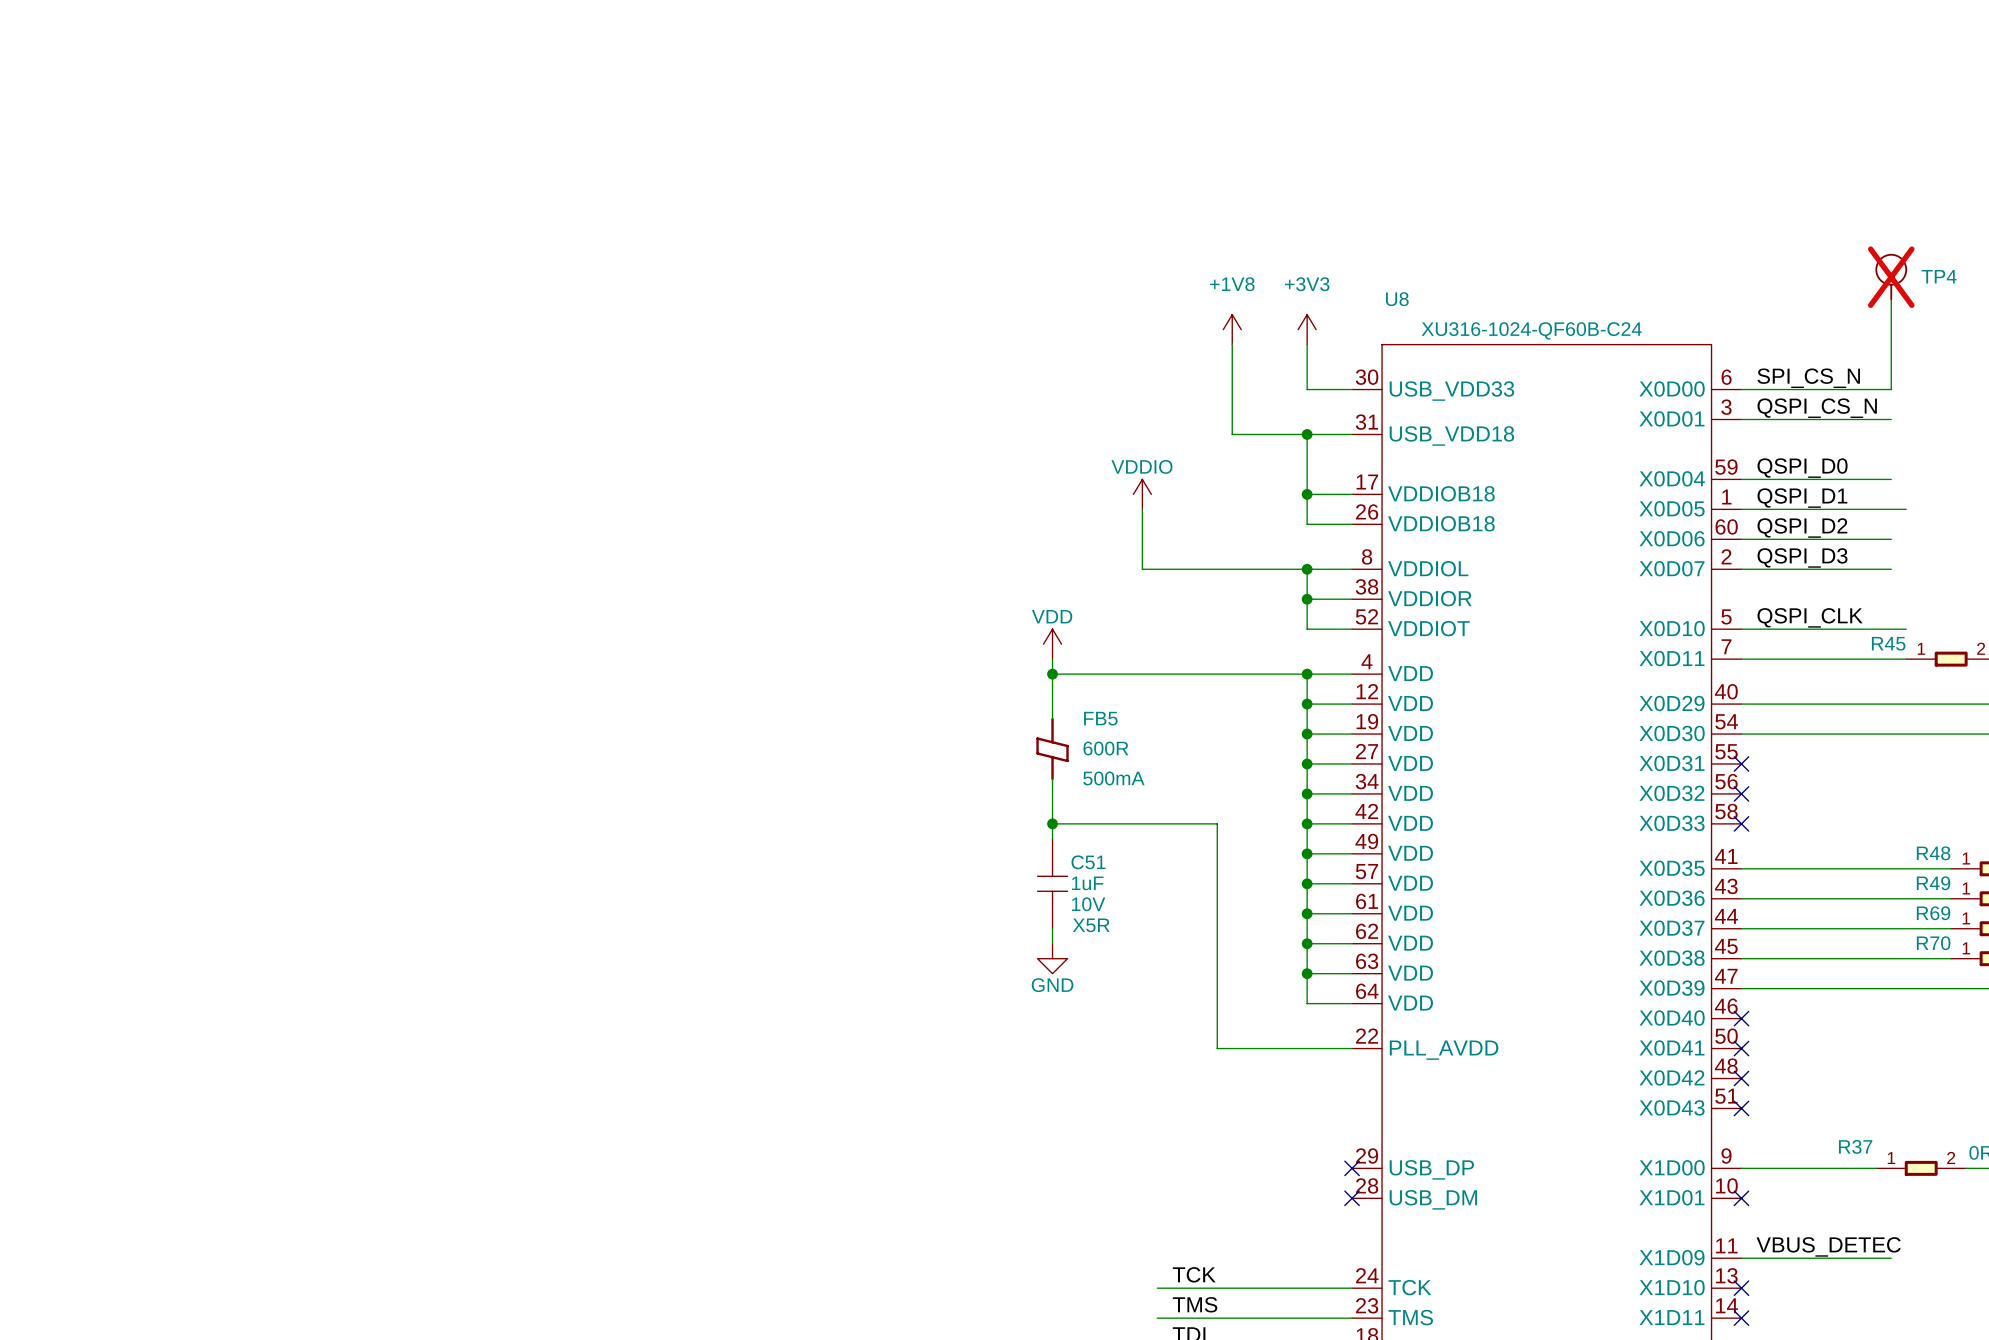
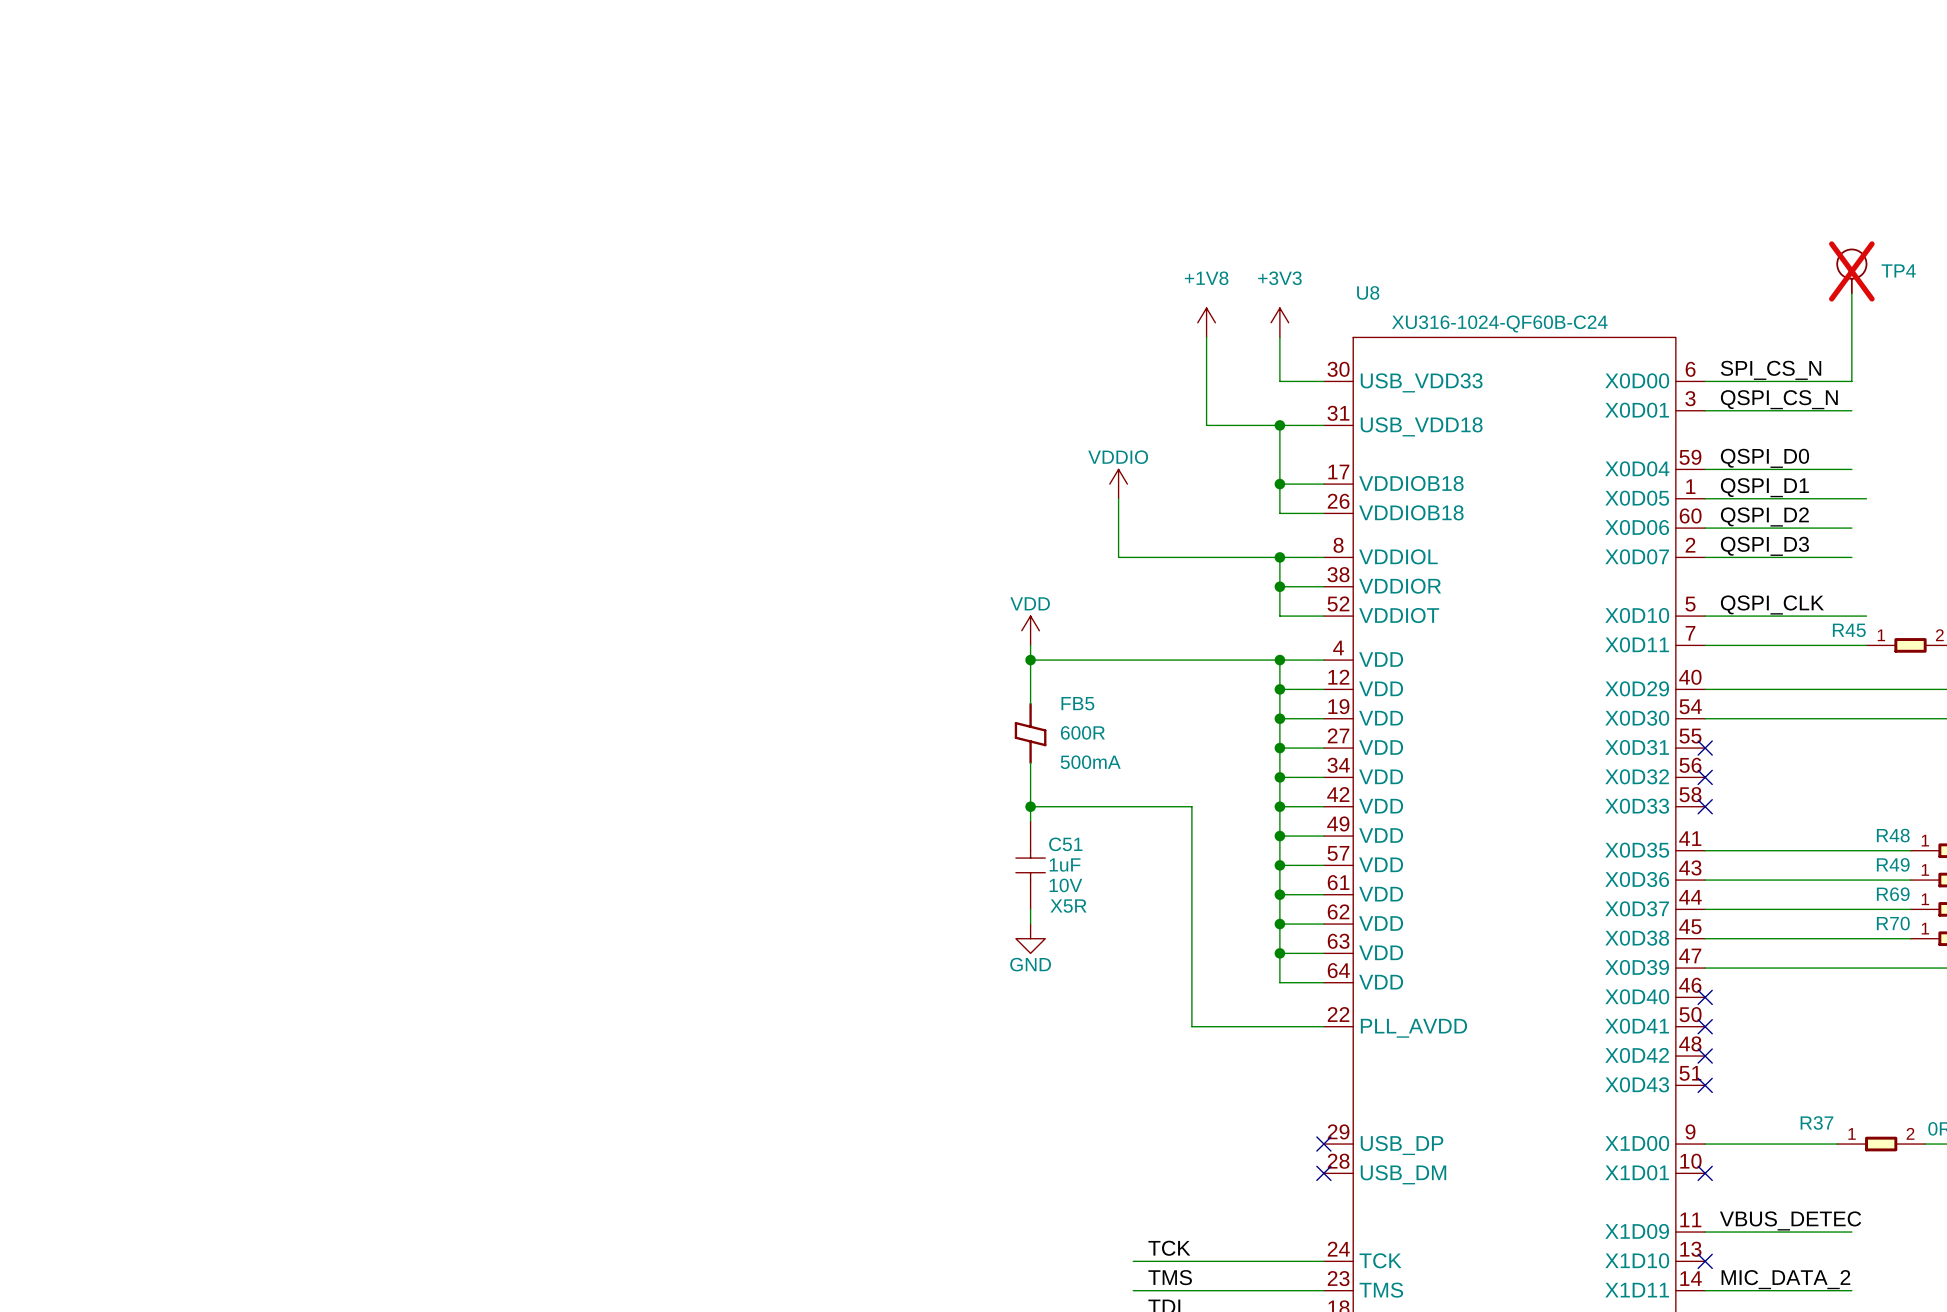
label: none -> MIC_DATA_2 (1785, 1279)
wire: none -> (1705, 1290) (1851, 1290)
no-connect mark: (1741, 1318) -> none

